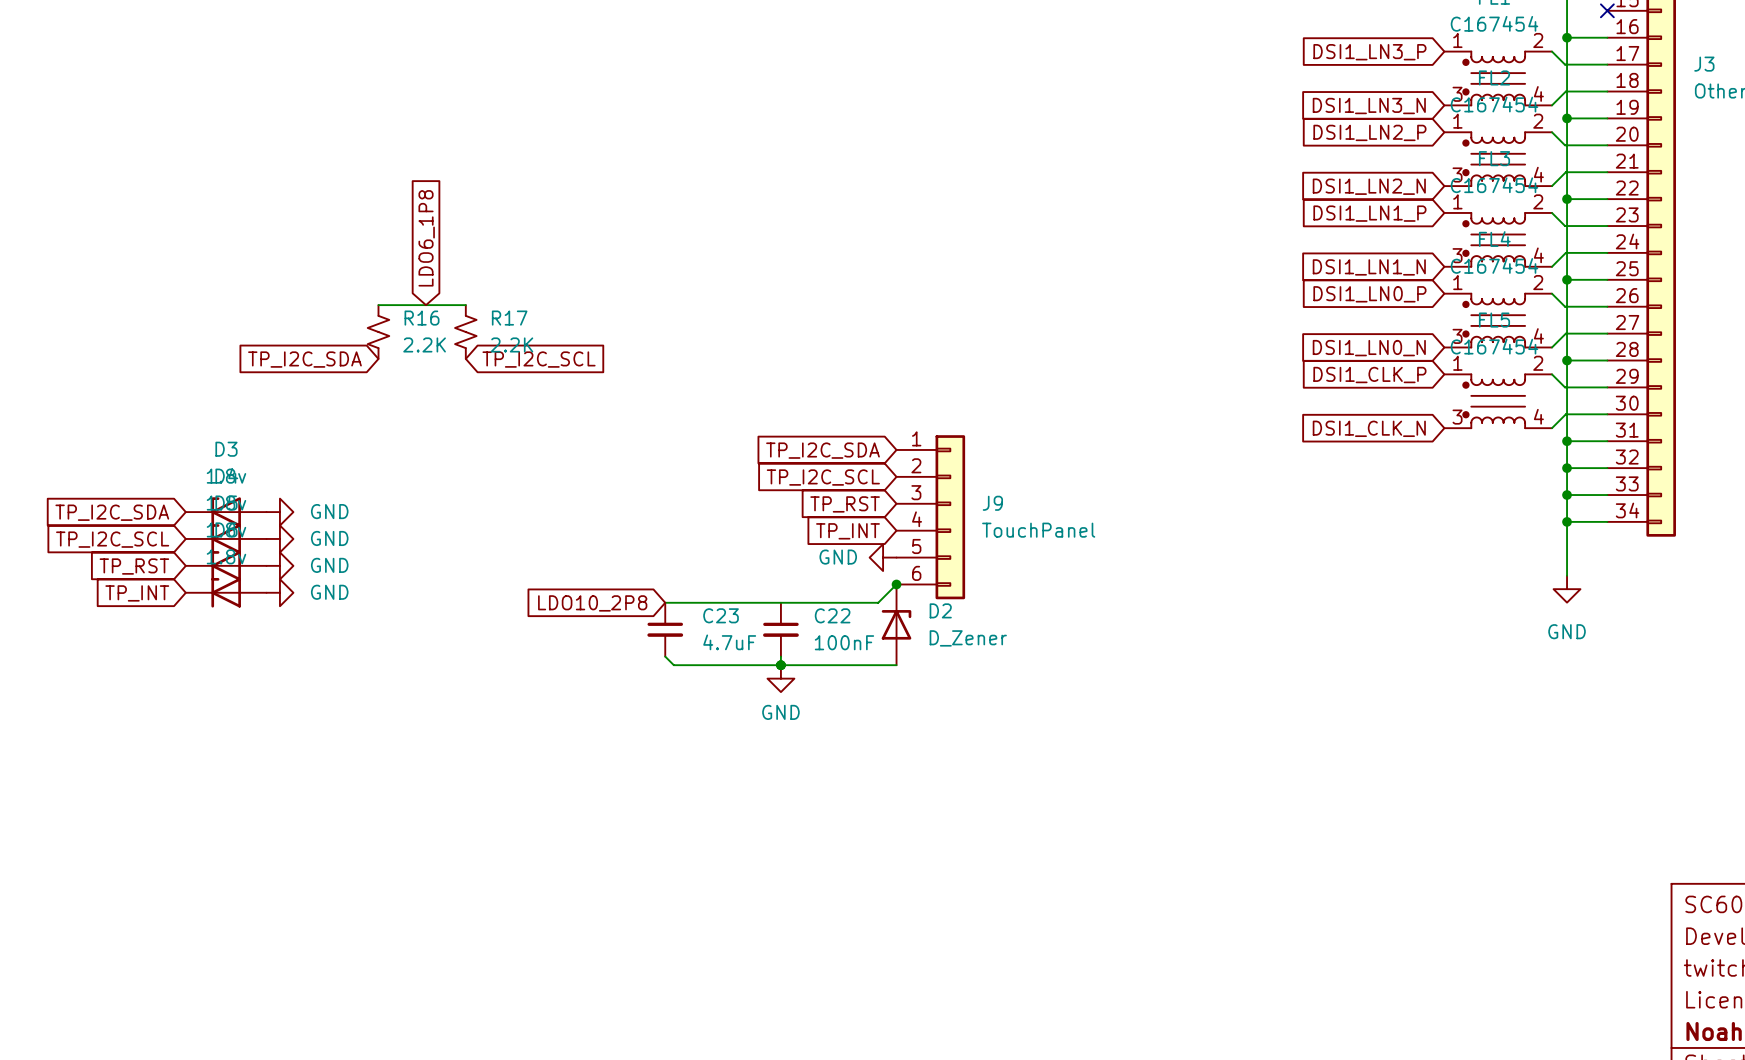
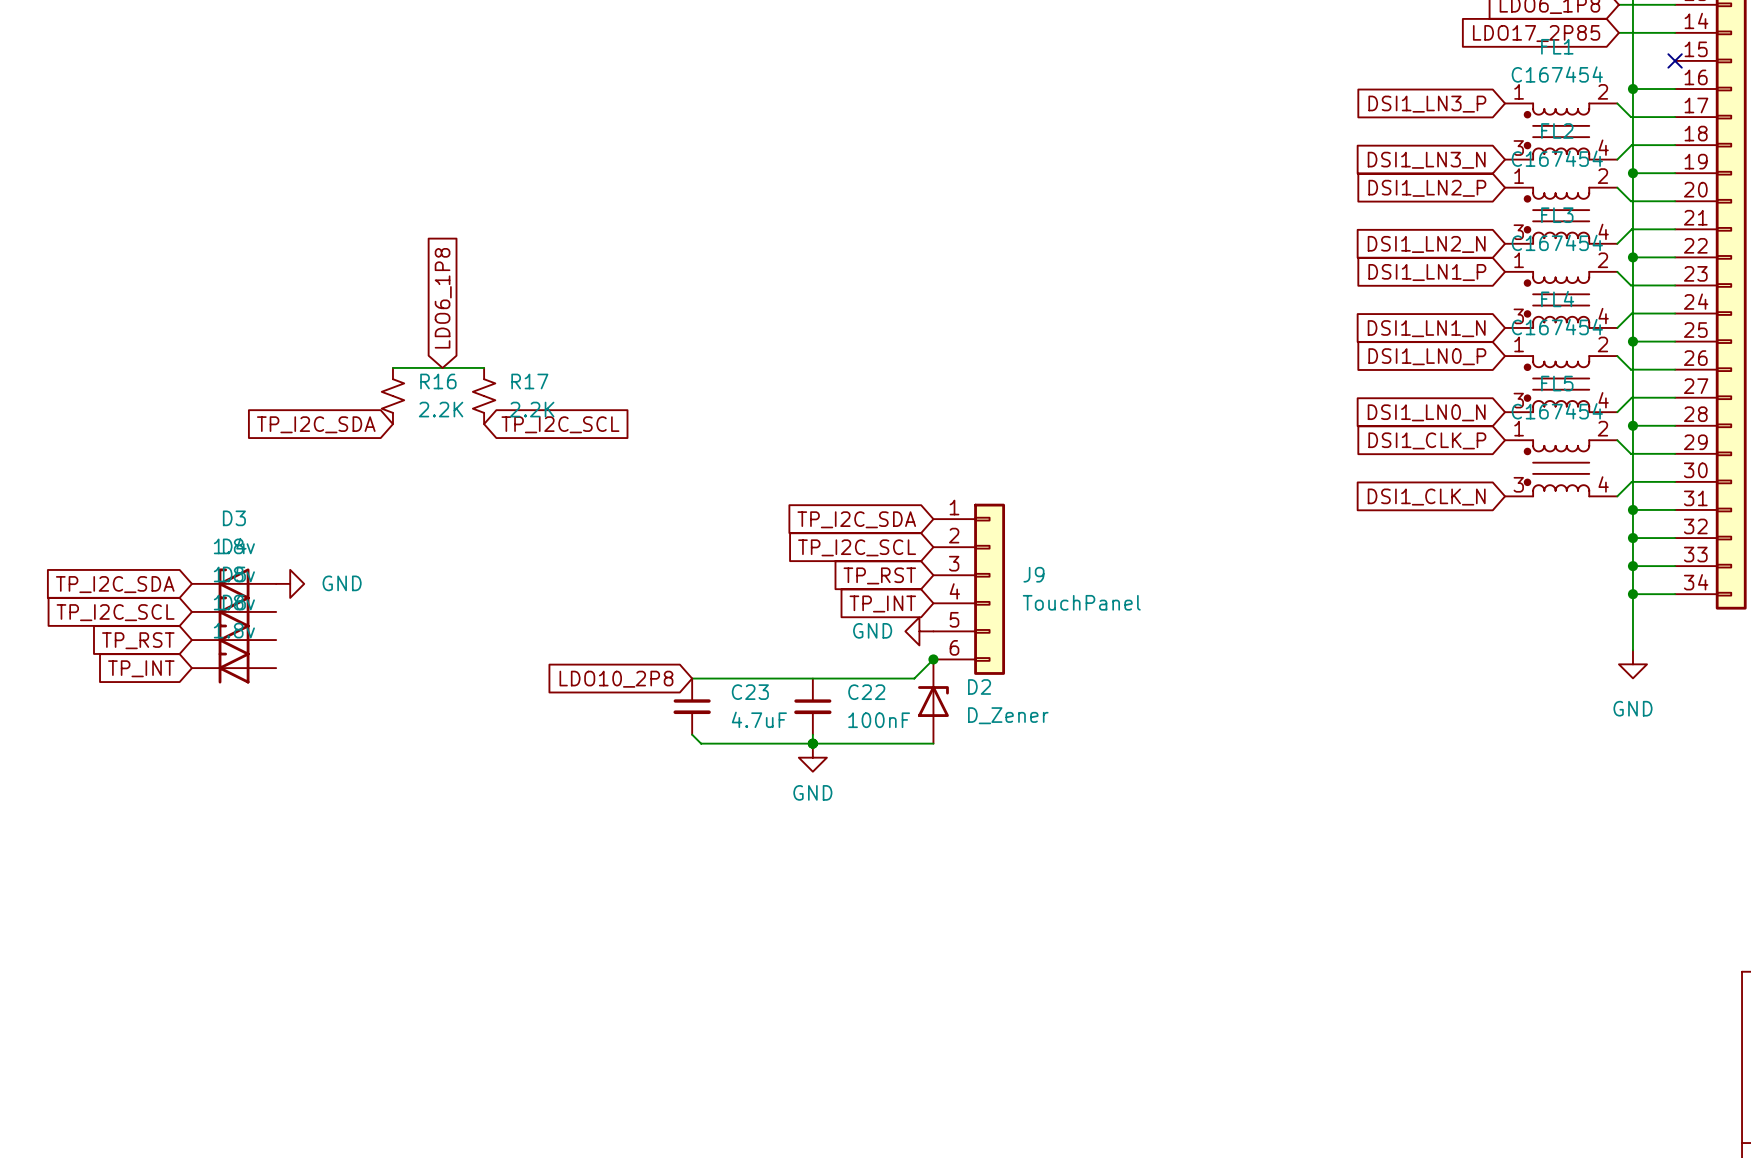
power symbol: GND (279, 538) -> none
power symbol: GND (279, 565) -> none
power symbol: GND (279, 592) -> none

